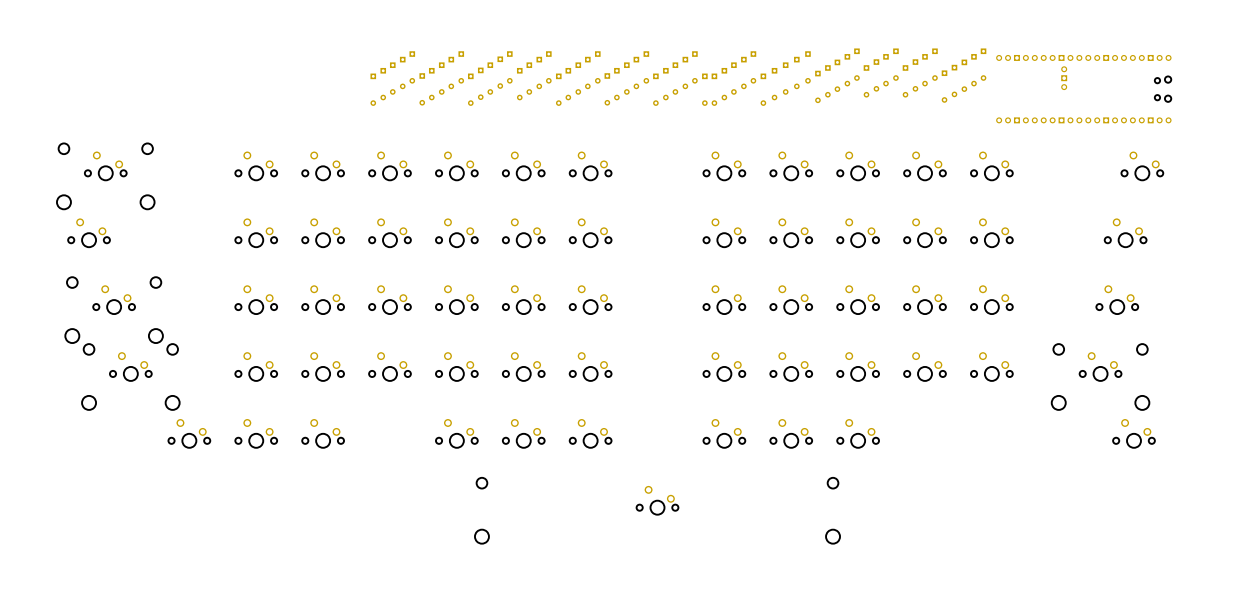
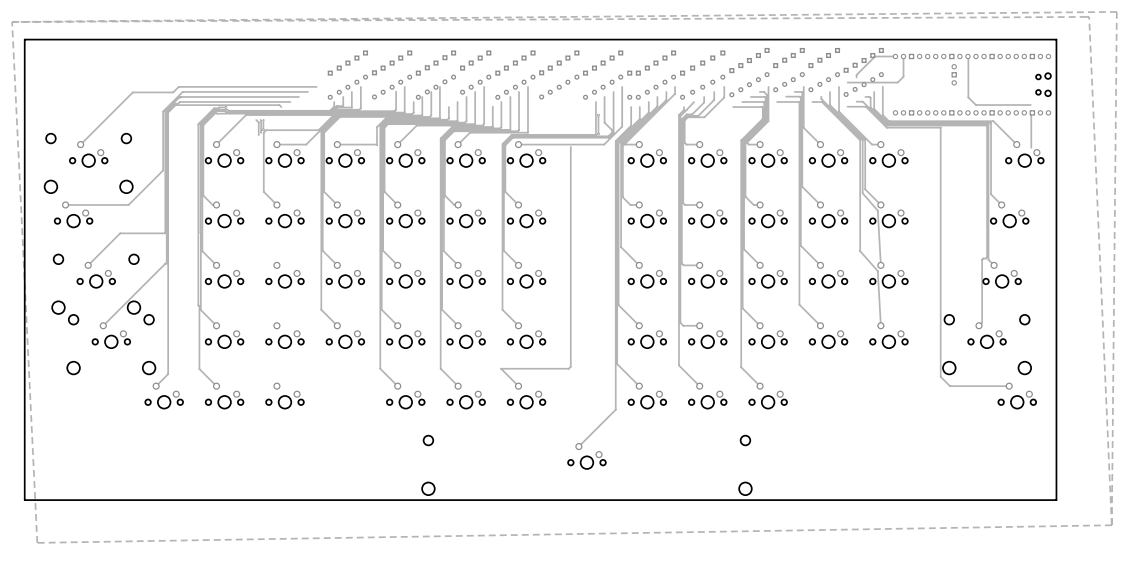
zone outline: none -> (12, 21) (1116, 11) (1111, 525)
zone outline: none -> (12, 21) (37, 542) (1111, 525)
zone outline: none -> (12, 21) (1089, 16) (1111, 525)
board edge: none -> (1056, 39) (24, 39) (24, 500) (1056, 500) (1056, 39)
track: none -> (895, 56) (875, 56) (856, 74) (856, 77)
track: none -> (903, 56) (903, 76) (897, 82) (847, 82)
track: none -> (967, 56) (968, 97) (975, 105) (1030, 105)
track: none -> (316, 86) (178, 86) (173, 92) (132, 92) (80, 144)
track: none -> (360, 86) (359, 109) (337, 109) (331, 115) (246, 115) (216, 144)
track: none -> (404, 86) (404, 112) (338, 112) (306, 144) (276, 144)
track: none -> (439, 86) (439, 118) (385, 118) (377, 127) (377, 145) (337, 144)
track: none -> (484, 86) (482, 125) (416, 125) (397, 144)
track: none -> (528, 86) (528, 132) (469, 132) (458, 144)
track: none -> (622, 86) (622, 126) (604, 144) (518, 144)
track: none -> (675, 86) (675, 93) (624, 144) (639, 144)
track: none -> (724, 86) (724, 97) (704, 117) (687, 117) (684, 120) (684, 142) (686, 144) (699, 144)
track: none -> (768, 86) (768, 121) (746, 142) (748, 144) (760, 144)
track: none -> (803, 86) (803, 127) (820, 144)
track: none -> (838, 86) (838, 111) (872, 144) (880, 144)
track: none -> (882, 86) (882, 115) (888, 121) (993, 121) (1016, 144)
track: none -> (396, 91) (394, 111) (337, 111) (318, 130) (266, 130) (263, 132) (263, 191) (276, 204)
track: none -> (308, 91) (182, 91) (163, 111) (163, 170) (128, 204) (65, 204)
track: none -> (351, 91) (351, 107) (337, 107) (331, 113) (215, 112) (203, 125) (203, 195) (212, 204) (216, 204)
track: none -> (431, 91) (429, 116) (339, 116) (324, 132) (324, 191) (337, 204)
track: none -> (475, 91) (475, 124) (388, 124) (384, 127) (384, 191) (397, 204)
track: none -> (519, 91) (517, 131) (453, 131) (444, 140) (444, 195) (454, 204) (458, 204)
track: none -> (613, 91) (613, 133) (609, 137) (512, 137) (505, 145) (505, 191) (518, 204)
track: none -> (666, 91) (666, 99) (622, 143) (622, 197) (630, 204) (639, 204)
track: none -> (714, 91) (714, 99) (698, 115) (687, 115) (683, 119) (683, 203) (685, 204) (699, 204)
track: none -> (759, 91) (764, 91) (767, 94) (767, 120) (745, 142) (745, 196) (753, 204) (760, 204)
track: none -> (794, 91) (802, 92) (802, 186) (820, 204)
track: none -> (829, 91) (829, 105) (865, 140) (865, 189) (880, 204)
track: none -> (874, 91) (874, 108) (887, 122) (991, 122) (991, 194) (1001, 204)
track: none -> (299, 96) (179, 97) (165, 111) (165, 233) (120, 233) (88, 265)
track: none -> (343, 96) (343, 105) (336, 106) (330, 112) (215, 111) (201, 124) (202, 251) (216, 265)
track: none -> (422, 96) (422, 115) (339, 115) (322, 132) (322, 250) (337, 265)
track: none -> (466, 96) (465, 122) (387, 122) (383, 127) (383, 250) (397, 265)
track: none -> (510, 96) (510, 129) (453, 129) (443, 139) (443, 251) (458, 265)
track: none -> (604, 96) (604, 122) (612, 130) (608, 136) (512, 136) (503, 144) (503, 250) (518, 265)
track: none -> (657, 96) (657, 106) (621, 142) (621, 247) (639, 265)
track: none -> (704, 96) (704, 102) (692, 114) (686, 114) (681, 119) (681, 263) (683, 265) (699, 265)
track: none -> (750, 96) (765, 97) (765, 120) (744, 141) (744, 249) (760, 265)
track: none -> (786, 96) (800, 97) (800, 245) (820, 265)
track: none -> (821, 96) (821, 98) (862, 140) (862, 193) (877, 210) (880, 265)
track: none -> (865, 96) (870, 97) (870, 107) (887, 124) (988, 124) (988, 259) (994, 265)
track: none -> (856, 101) (862, 101) (886, 125) (987, 126) (987, 257) (982, 259) (982, 322) (979, 325)
track: none -> (290, 102) (179, 102) (175, 103) (166, 111) (166, 263) (103, 325)
track: none -> (334, 102) (334, 106) (329, 110) (214, 109) (200, 123) (200, 310) (216, 325)
track: none -> (413, 102) (412, 114) (338, 114) (321, 131) (321, 309) (337, 325)
track: none -> (457, 102) (457, 121) (386, 121) (381, 126) (381, 309) (397, 325)
track: none -> (501, 102) (500, 128) (452, 128) (442, 139) (442, 309) (458, 325)
track: none -> (595, 102) (595, 134) (511, 134) (502, 144) (502, 309) (518, 325)
track: none -> (648, 102) (648, 112) (618, 142) (618, 305) (639, 325)
track: none -> (694, 102) (680, 116) (680, 322) (683, 325) (699, 325)
track: none -> (742, 102) (764, 102) (764, 119) (742, 140) (742, 308) (760, 325)
track: none -> (777, 102) (799, 102) (799, 304) (820, 325)
track: none -> (812, 102) (821, 102) (860, 140) (860, 251) (877, 271) (880, 325)
track: none -> (281, 107) (279, 105) (175, 105) (168, 112) (168, 374) (156, 386)
track: none -> (448, 107) (447, 119) (386, 119) (380, 125) (380, 368) (397, 386)
track: none -> (492, 106) (492, 126) (452, 126) (440, 138) (440, 368) (458, 386)
track: none -> (631, 107) (631, 125) (615, 141) (615, 409) (578, 446)
track: none -> (639, 107) (639, 119) (617, 141) (617, 364) (639, 386)
track: none -> (684, 107) (684, 110) (678, 115) (678, 365) (699, 386)
track: none -> (733, 107) (762, 107) (762, 118) (741, 140) (741, 367) (760, 386)
track: none -> (847, 106) (865, 106) (886, 127) (940, 127) (940, 376) (950, 386) (1009, 386)
track: none -> (226, 107) (214, 108) (198, 124) (199, 369) (216, 386)
via: none -> (226, 107)
track: none -> (1032, 112) (1031, 147)
track: none -> (598, 115) (598, 134)
via: none -> (598, 115)
track: none -> (256, 120) (258, 122) (258, 135)
track: none -> (260, 120) (261, 132)
track: none -> (263, 120) (263, 129)
via: none -> (263, 129)
via: none -> (598, 134)
track: none -> (570, 146) (570, 366) (568, 368) (501, 368) (518, 386)

